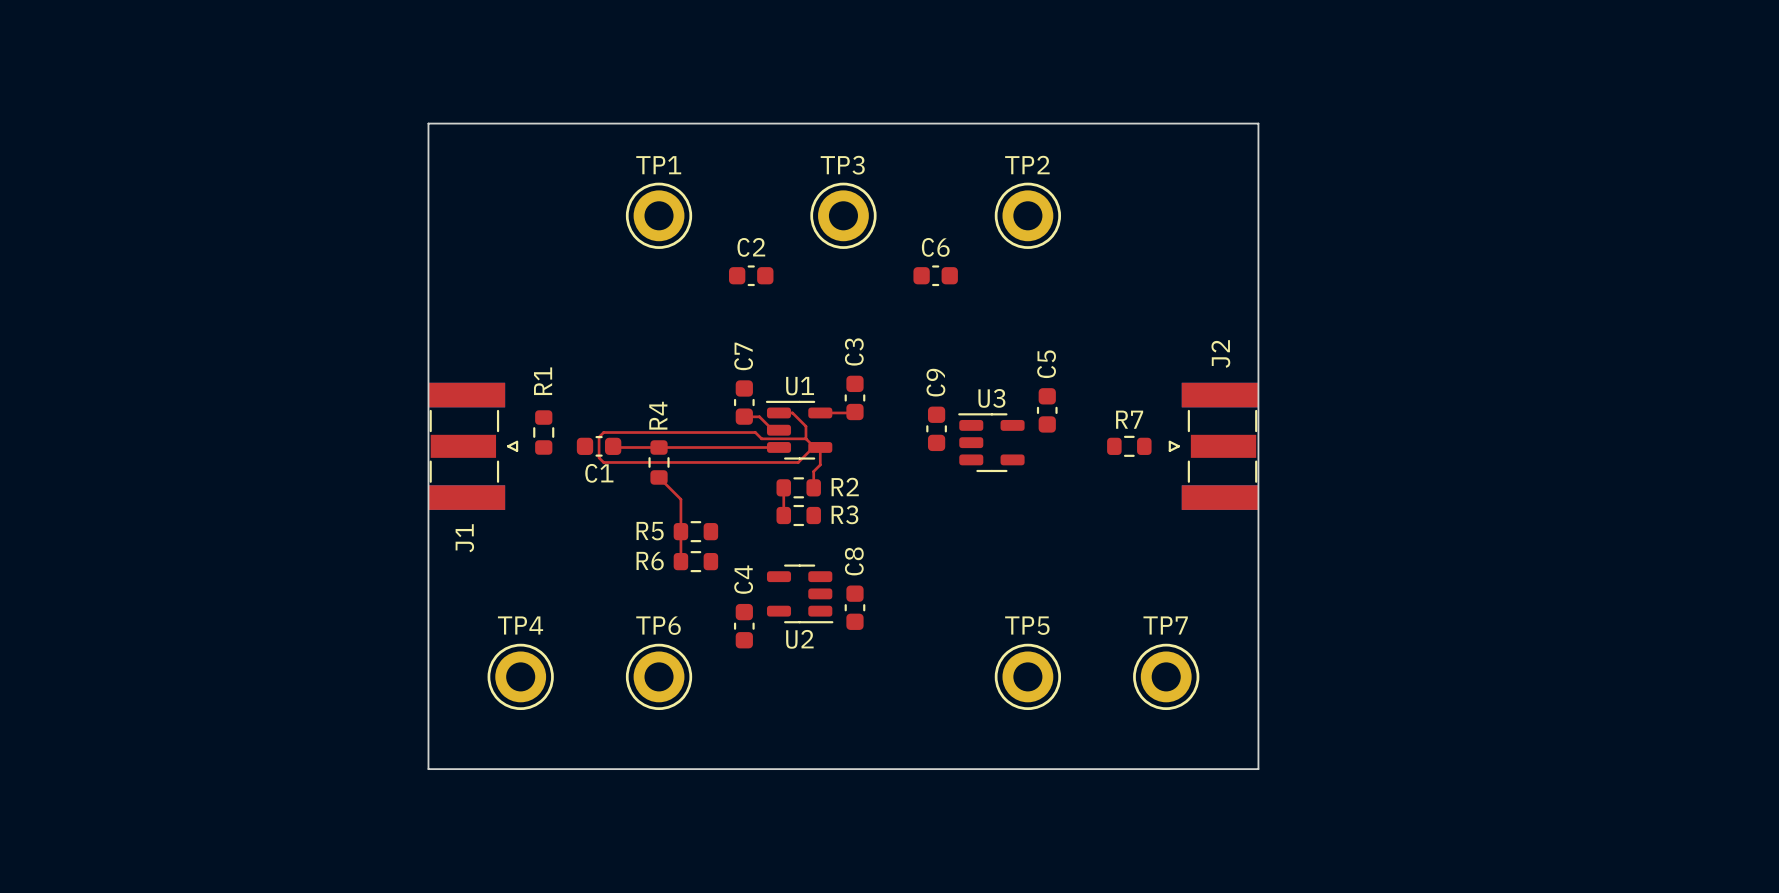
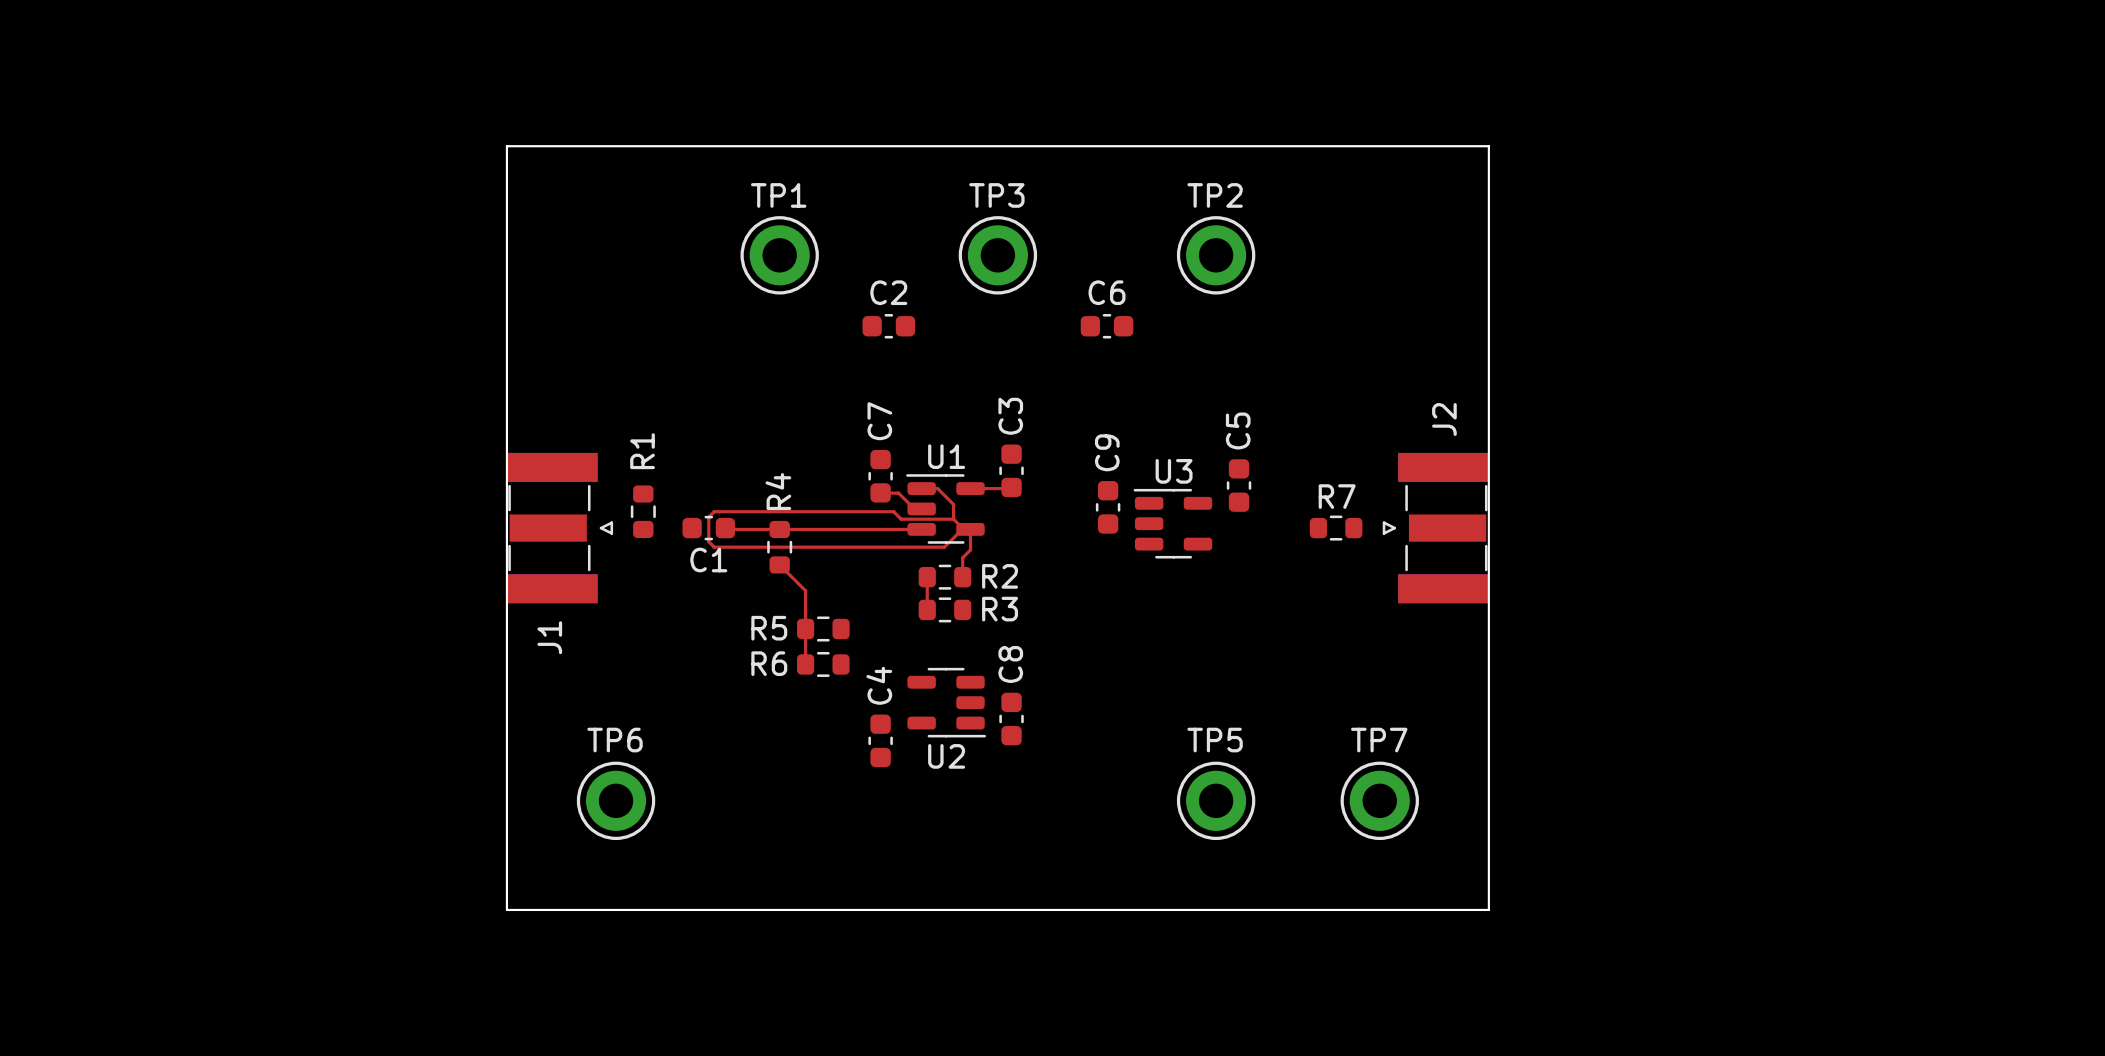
TP4 name: TP4 (520, 625) -> TP6 (615, 740)
TP6: (659, 676) -> none

